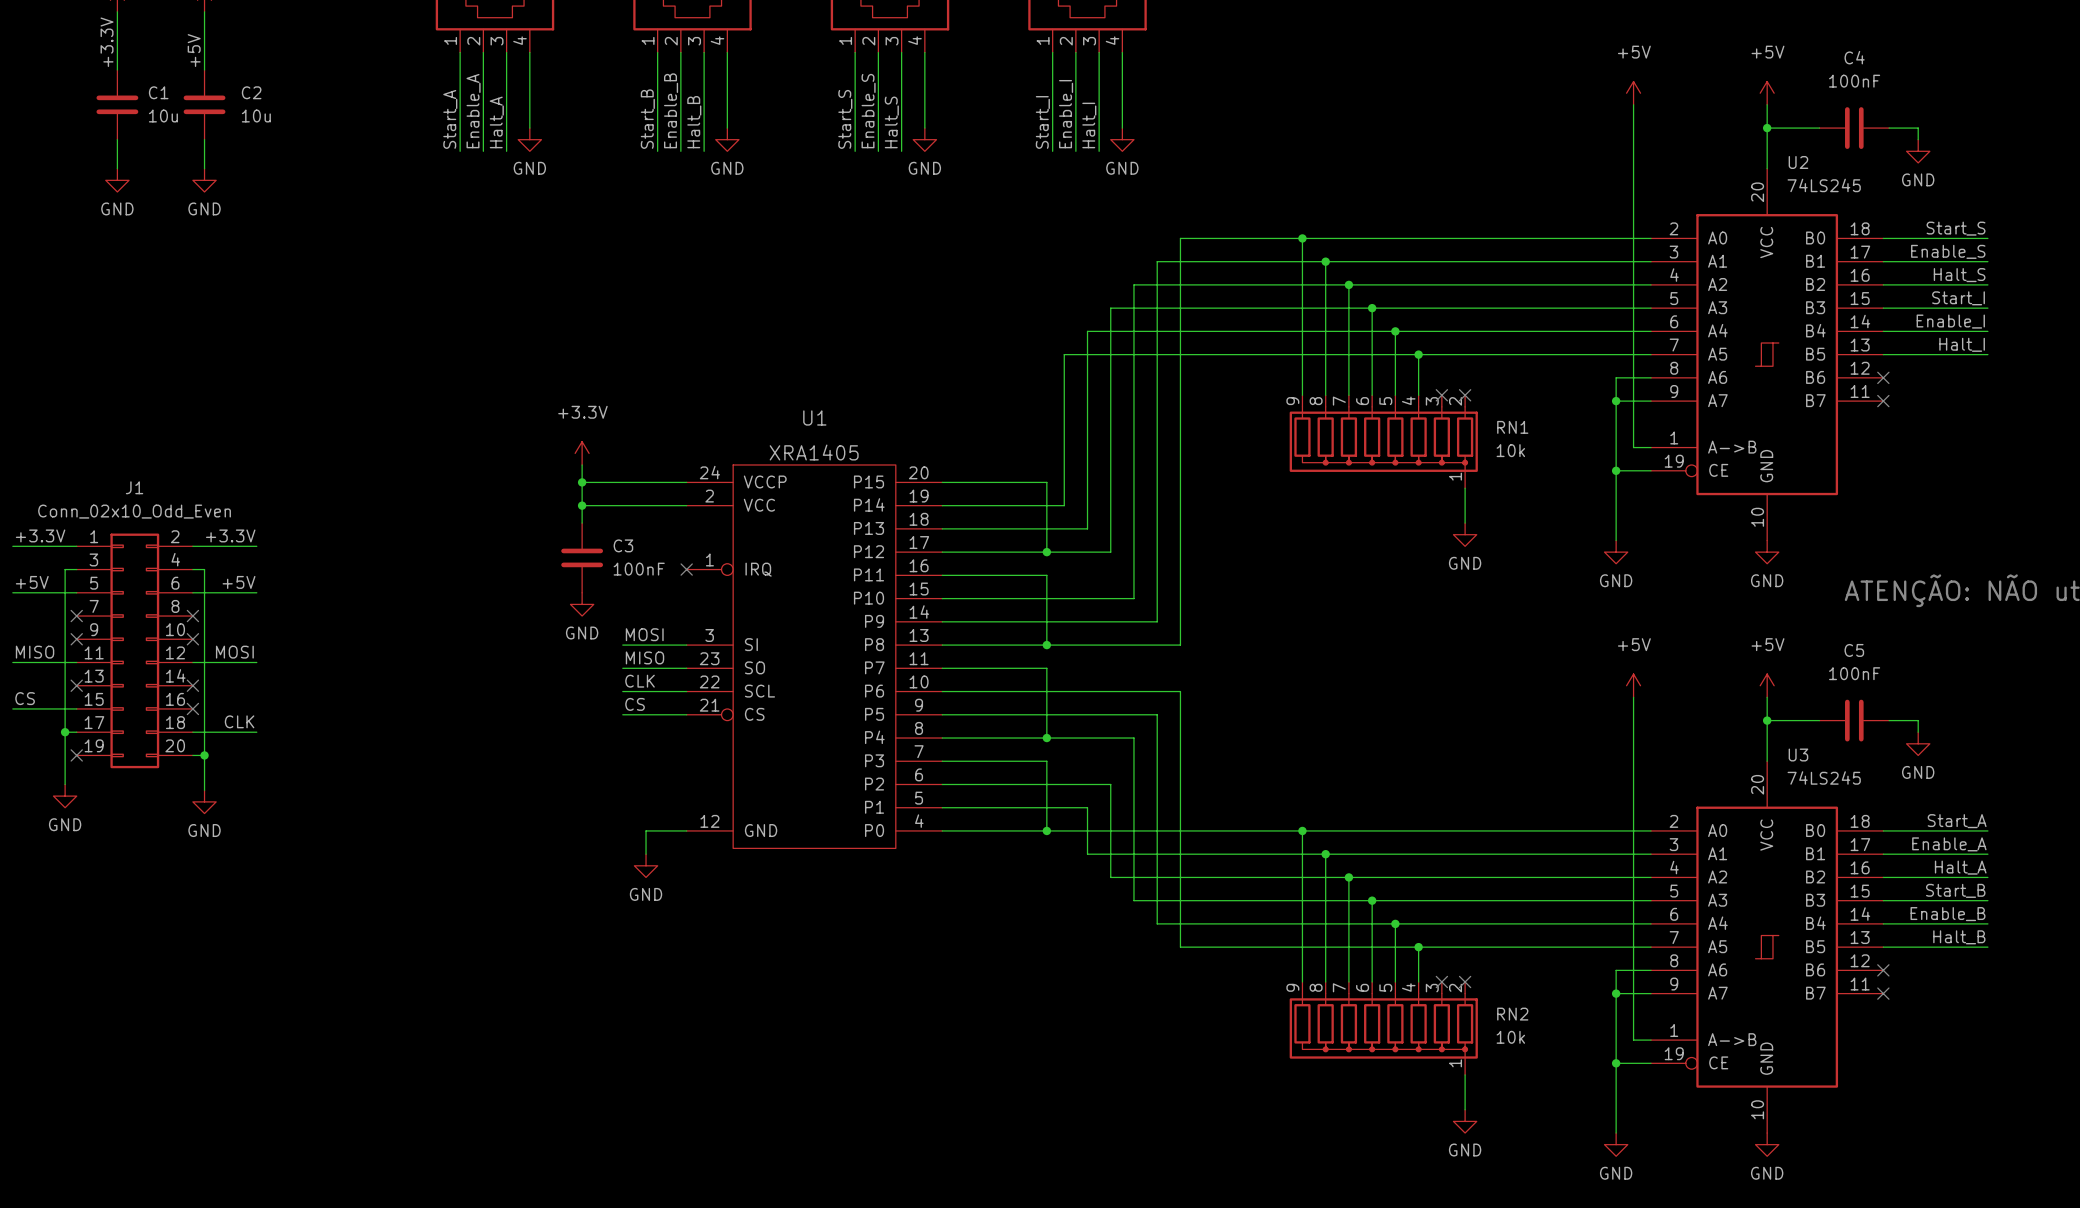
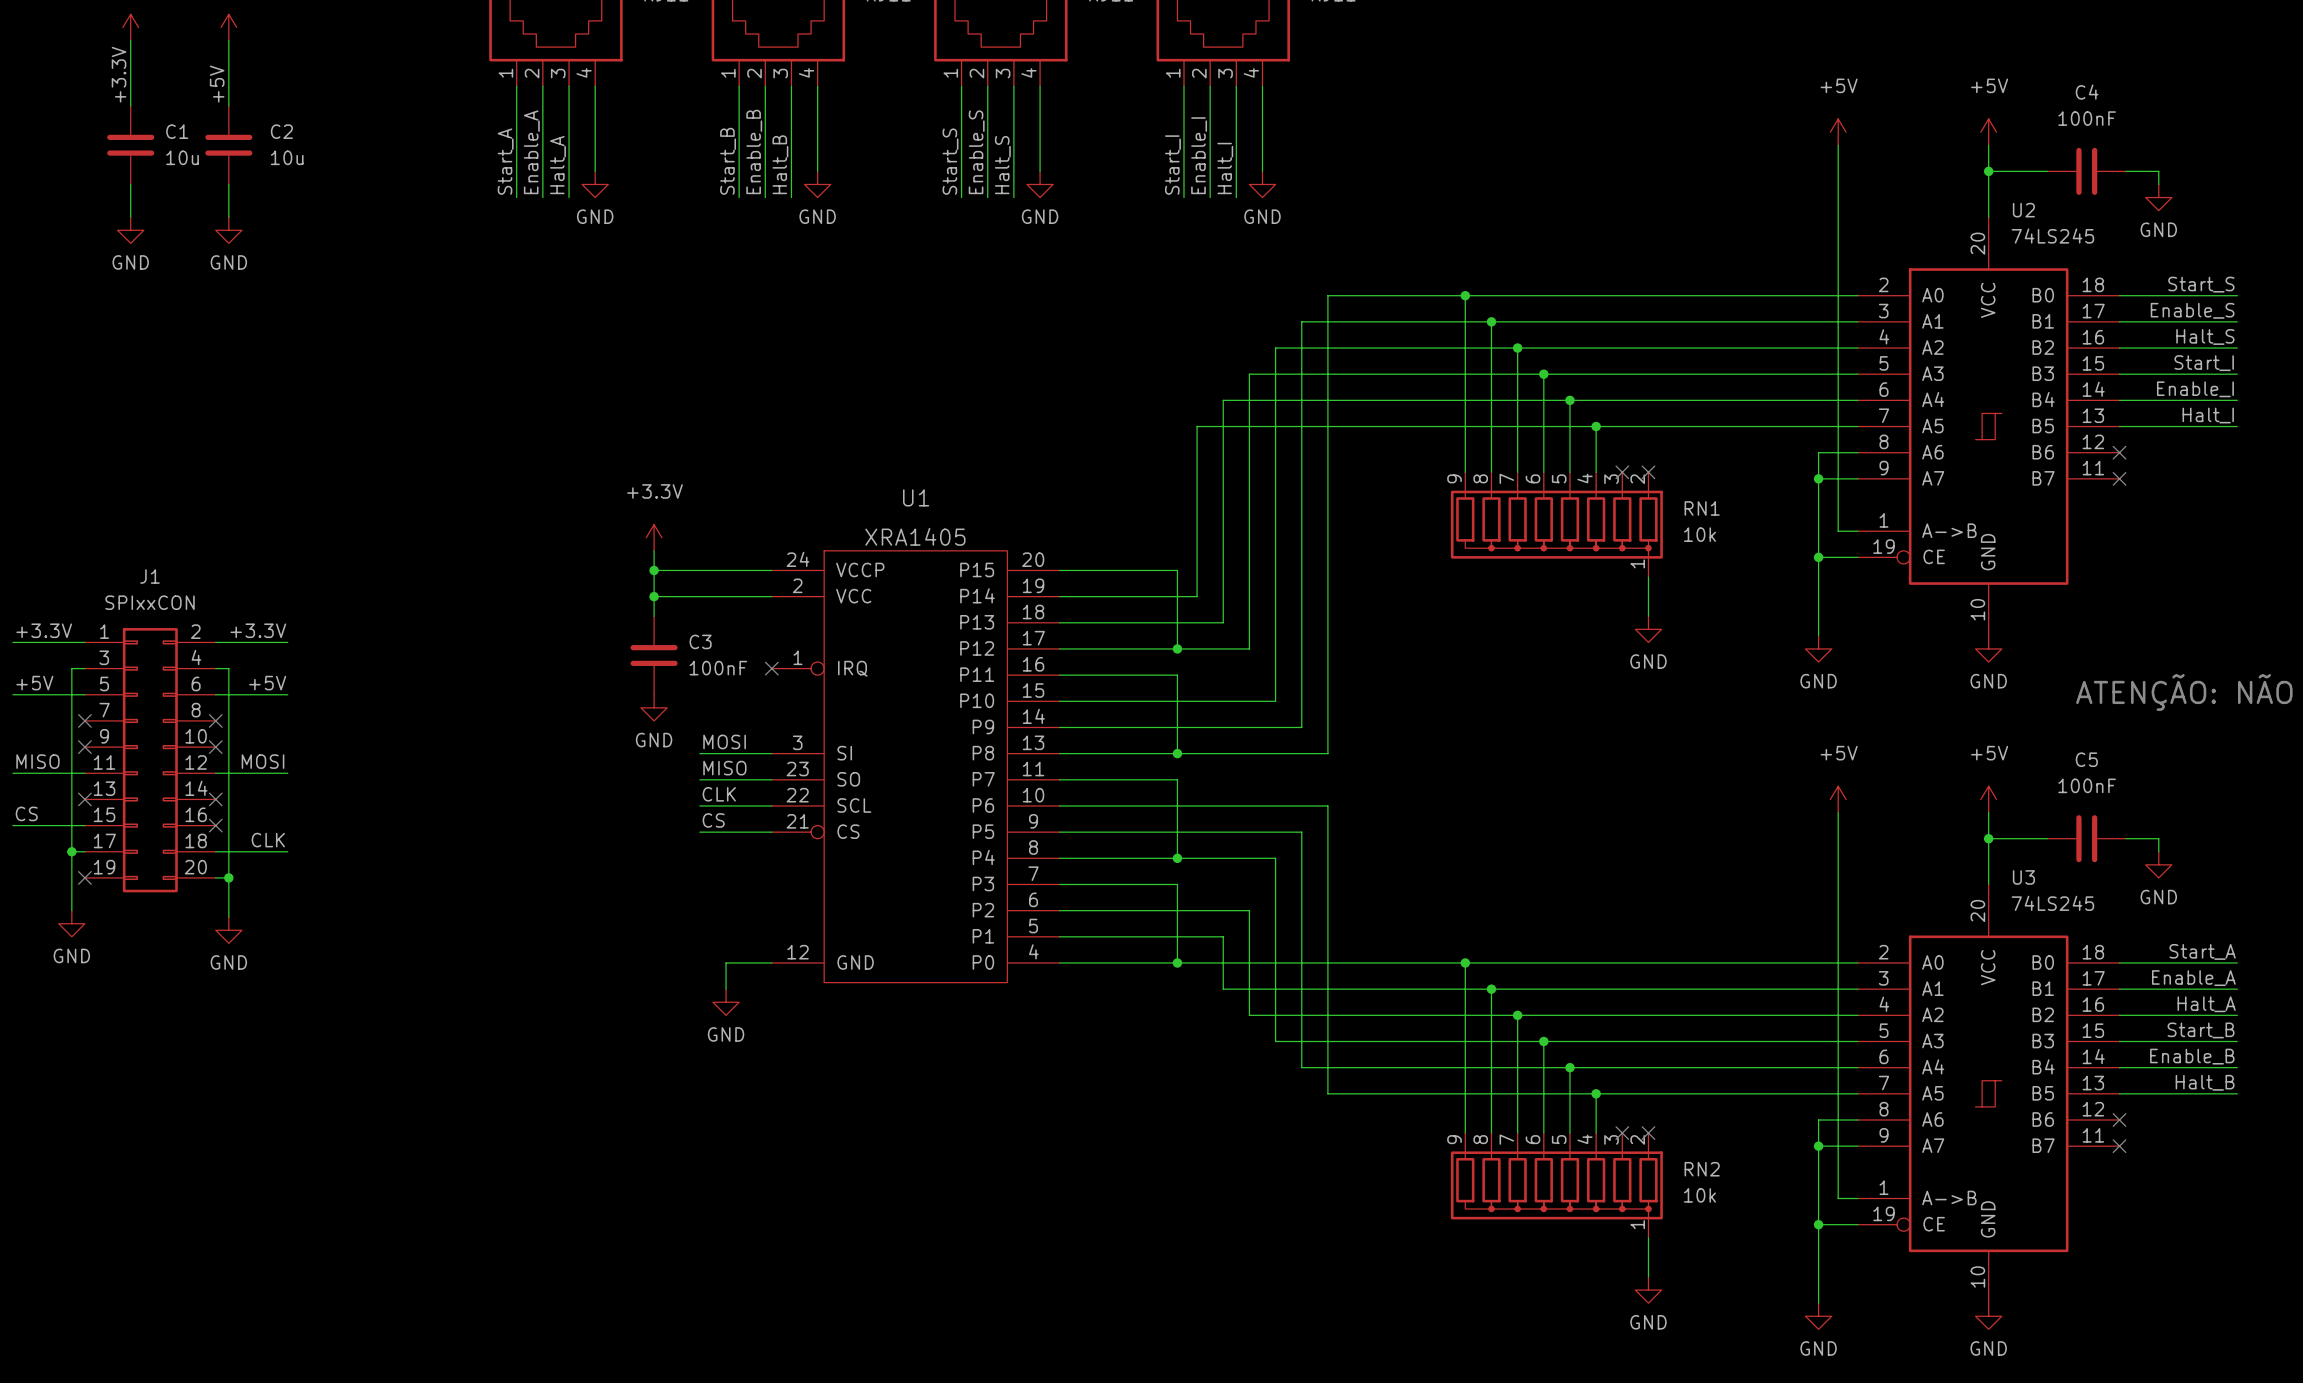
J1 value: Conn_02x10_Odd_Even (134, 511) -> SPIxxCON (150, 602)

